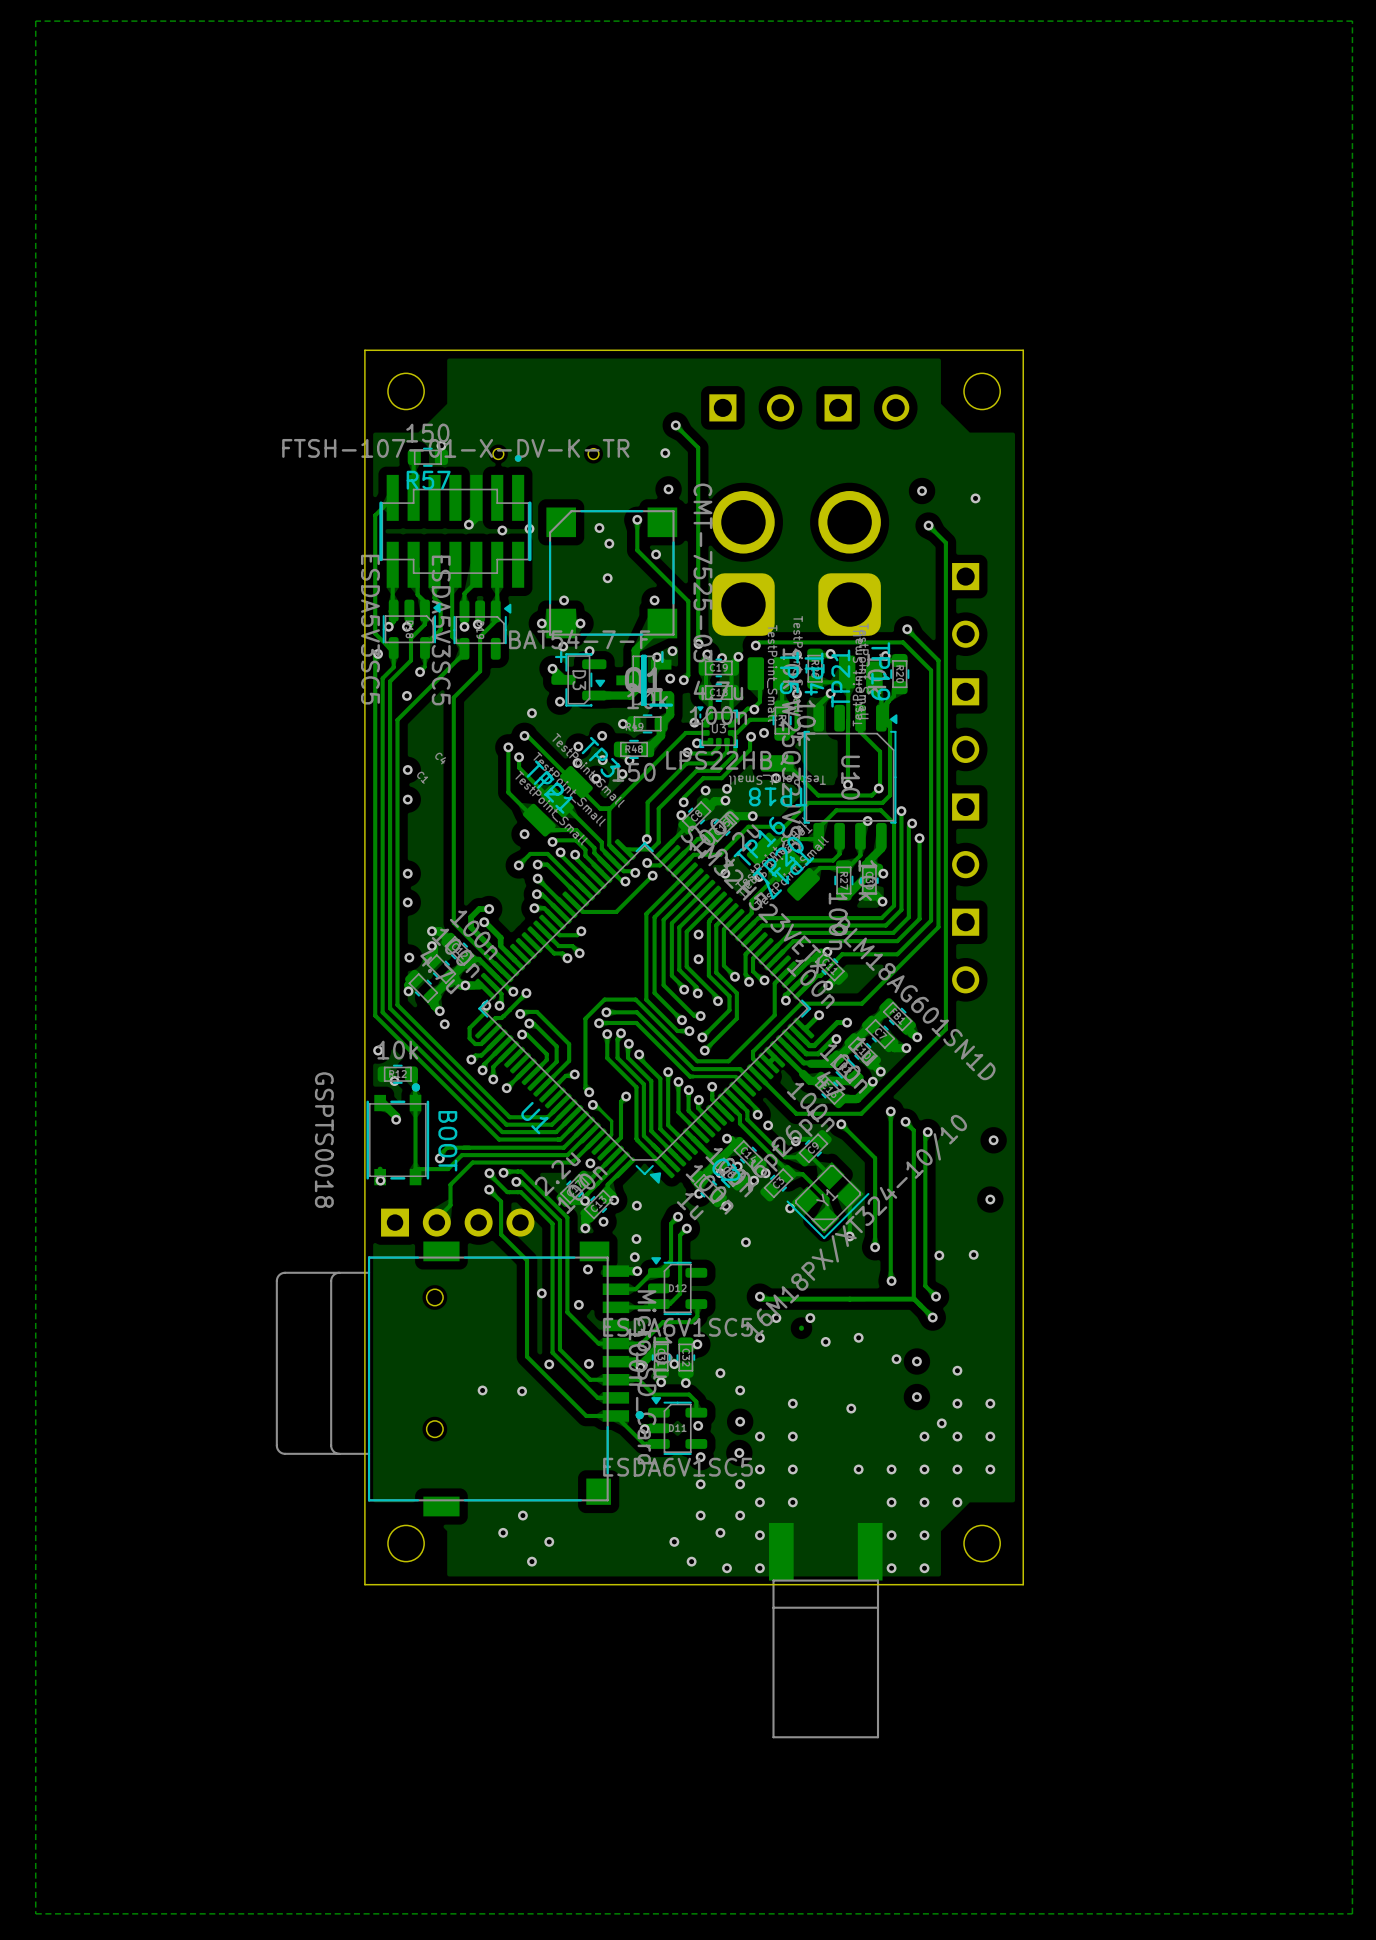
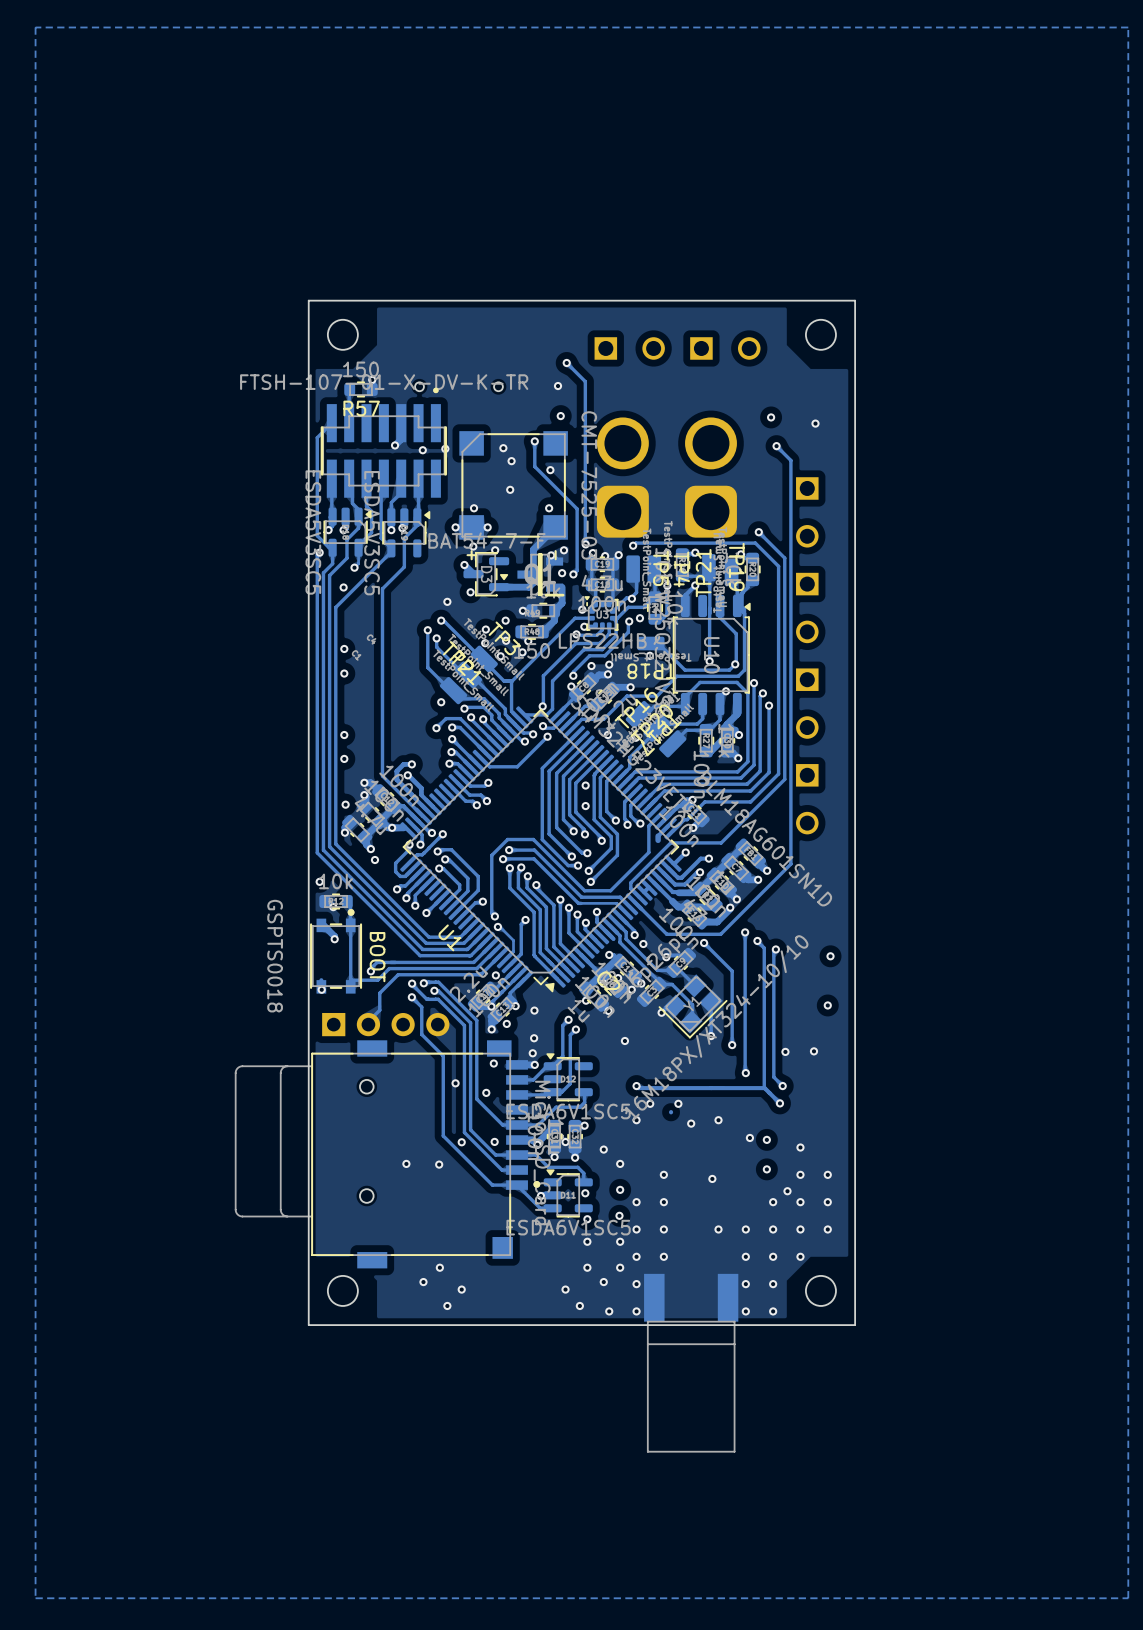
via: (785, 1000) -> none

